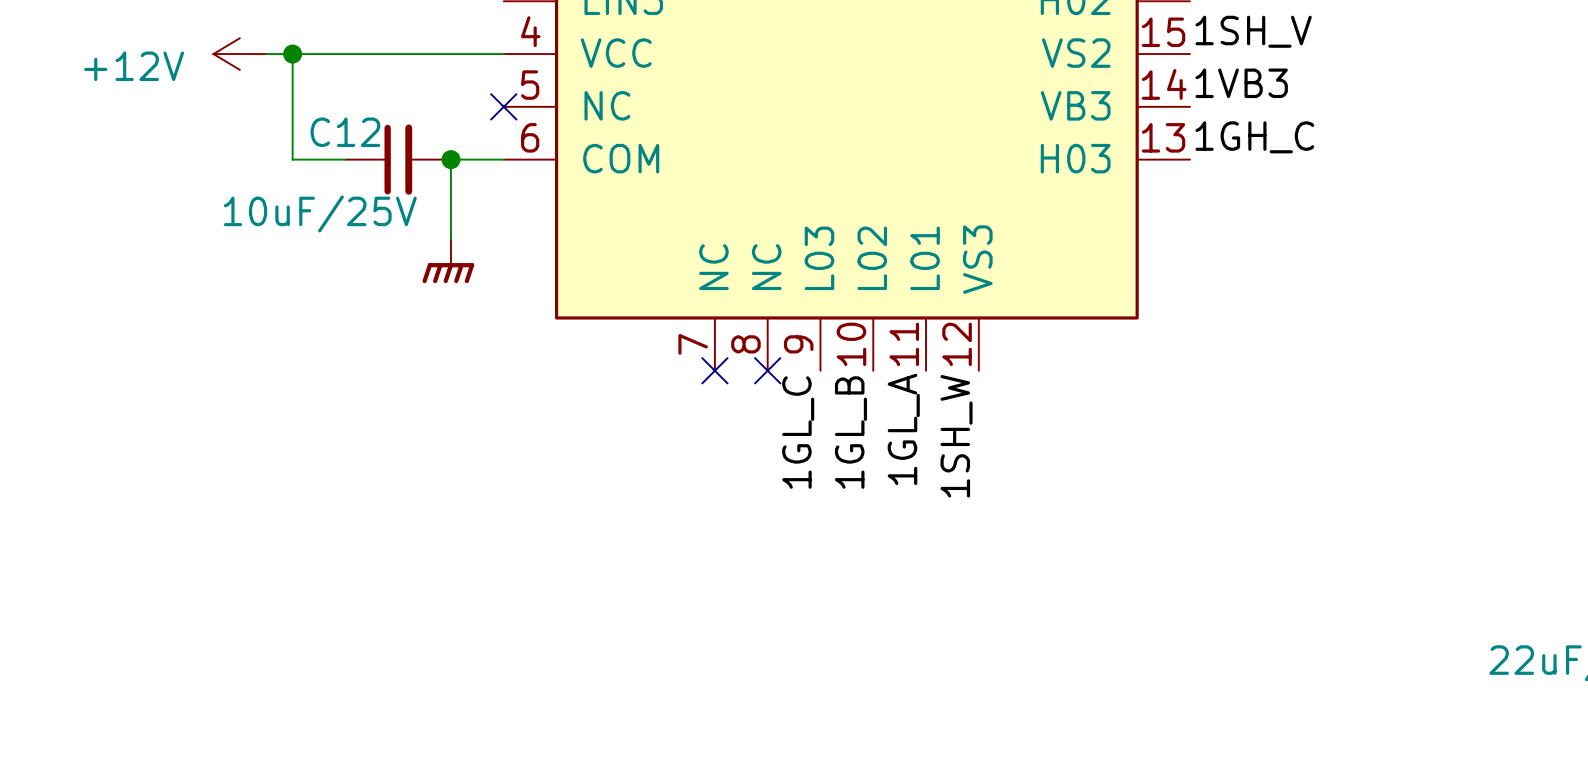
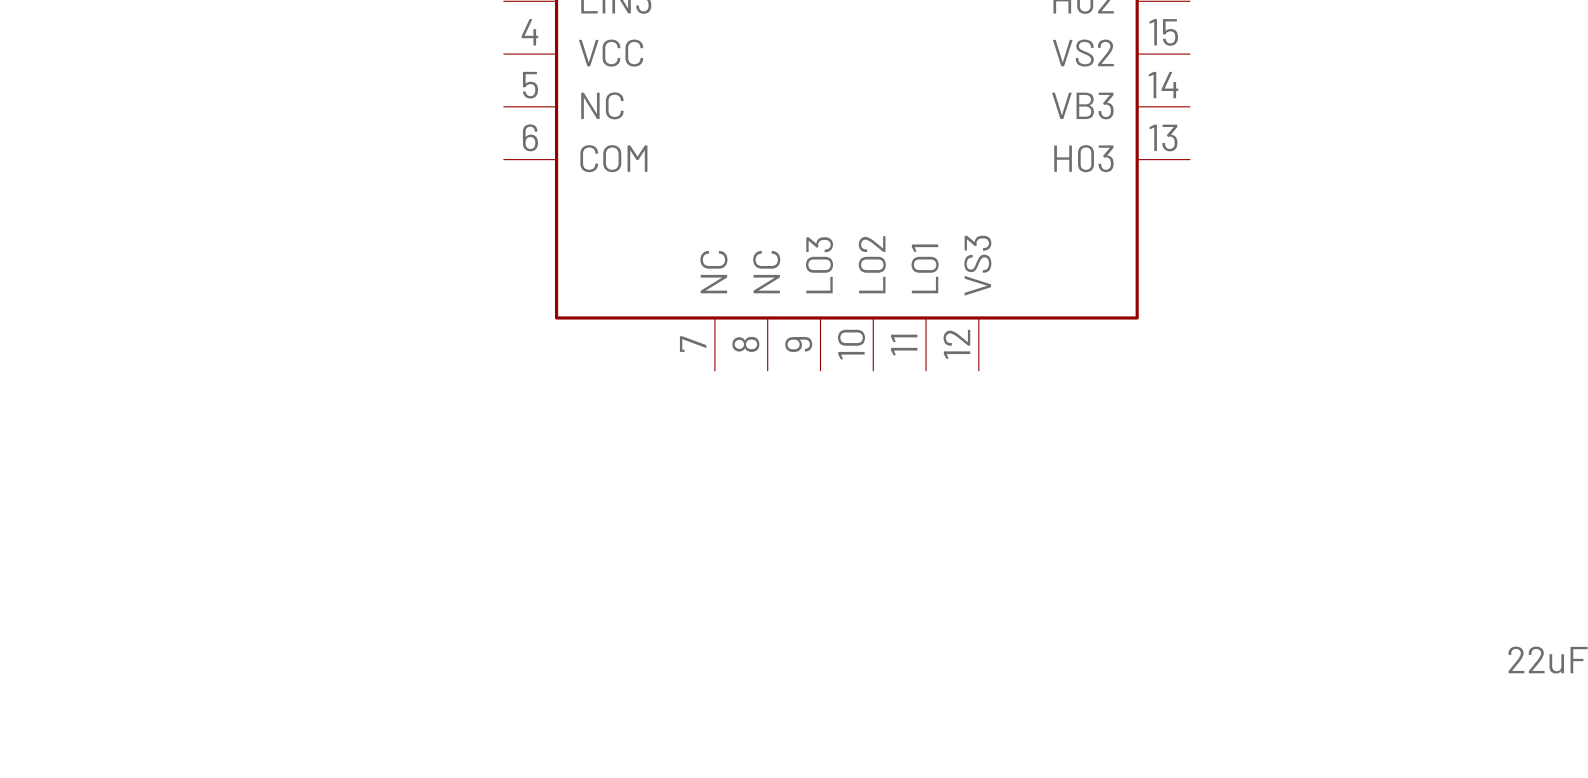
label: 1SH_V (1253, 31) -> none
power symbol: +12V (239, 54) -> none
wire: (266, 54) (503, 54) -> none
wire: (292, 54) (292, 159) (345, 159) -> none
junction: (292, 54) -> none
label: 1VB3 (1241, 83) -> none
no-connect mark: (503, 106) -> none
label: 1GH_C (1254, 137) -> none
C12: 10uF/25V (398, 159) -> none
junction: (450, 159) -> none
wire: (503, 159) (450, 159) (450, 238) -> none
power symbol: (448, 260) -> none
no-connect mark: (714, 370) -> none
no-connect mark: (767, 370) -> none
label: 1GL_A (903, 429) -> none
label: 1GL_C (798, 432) -> none
label: 1GL_B (850, 432) -> none
label: 1SH_W (956, 436) -> none

